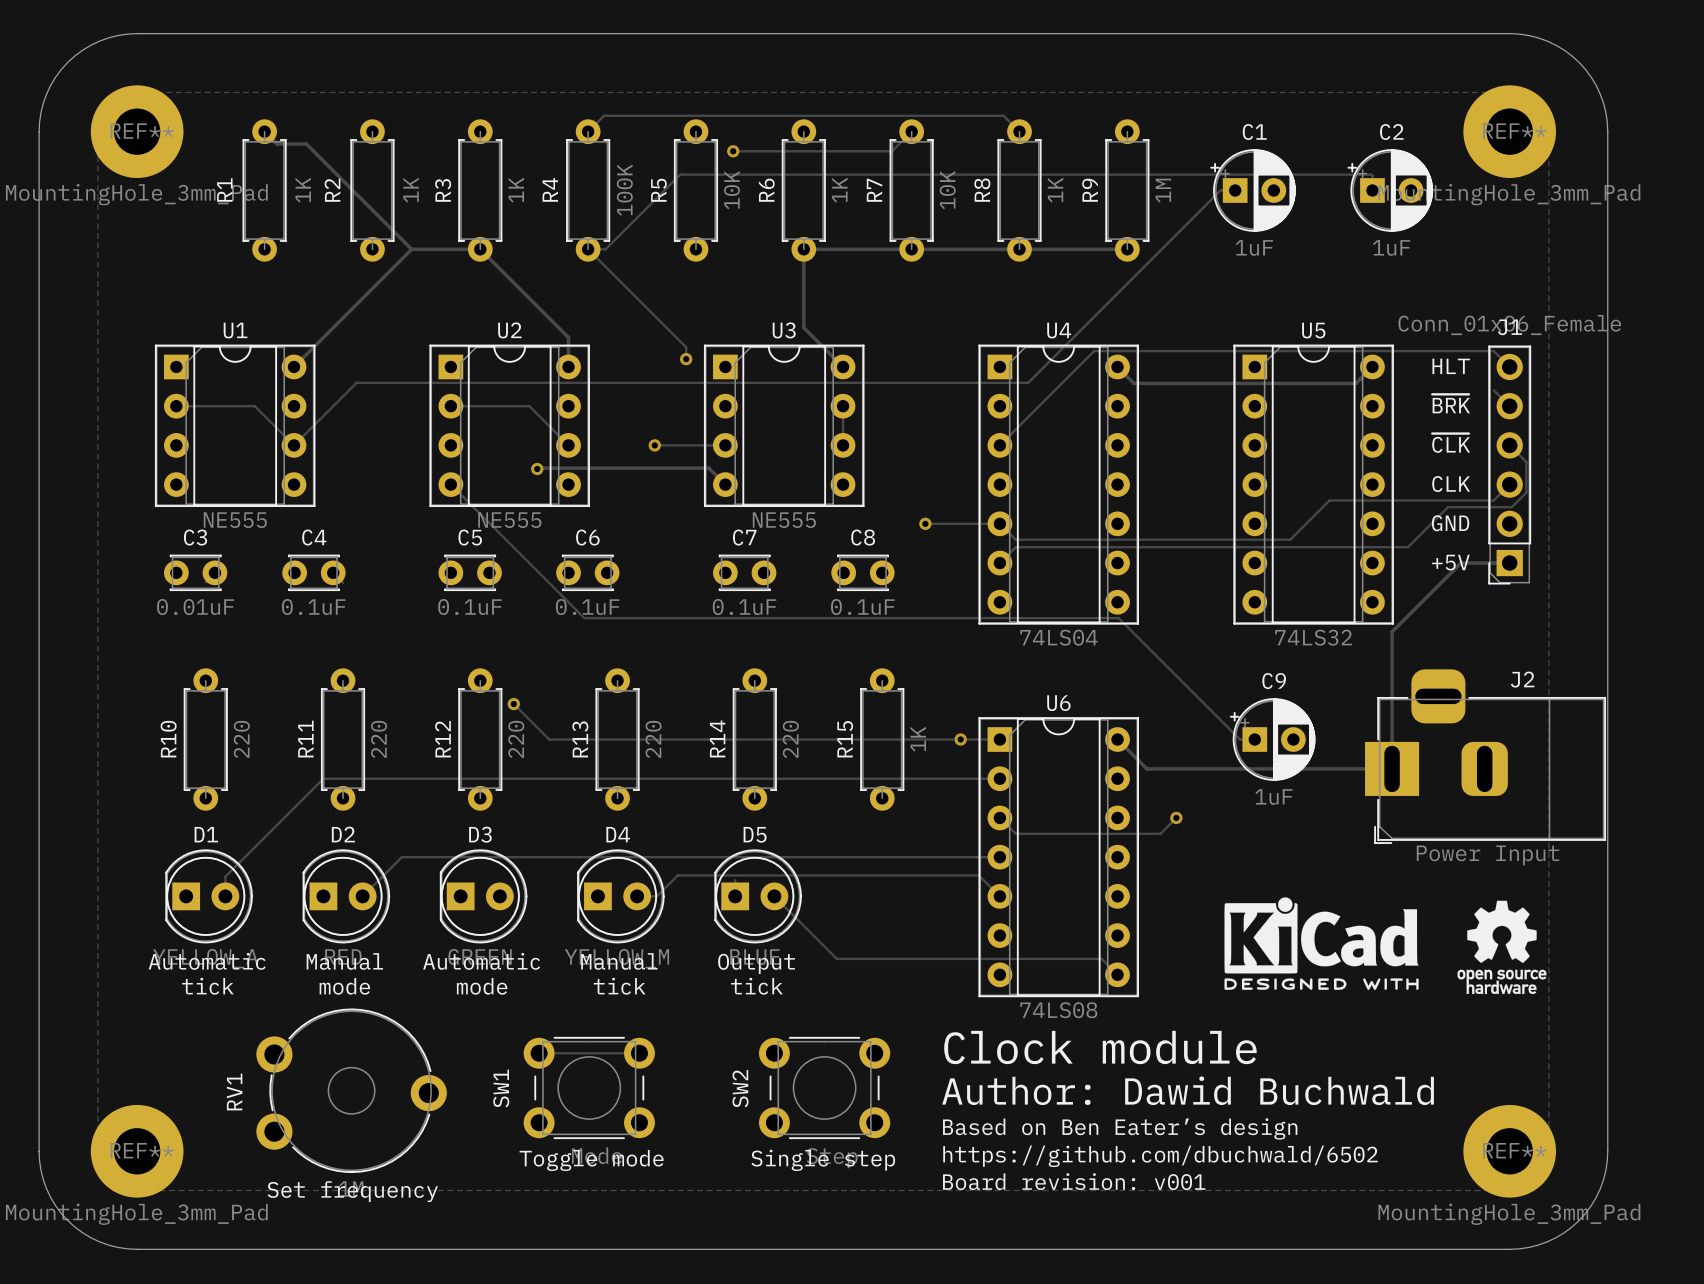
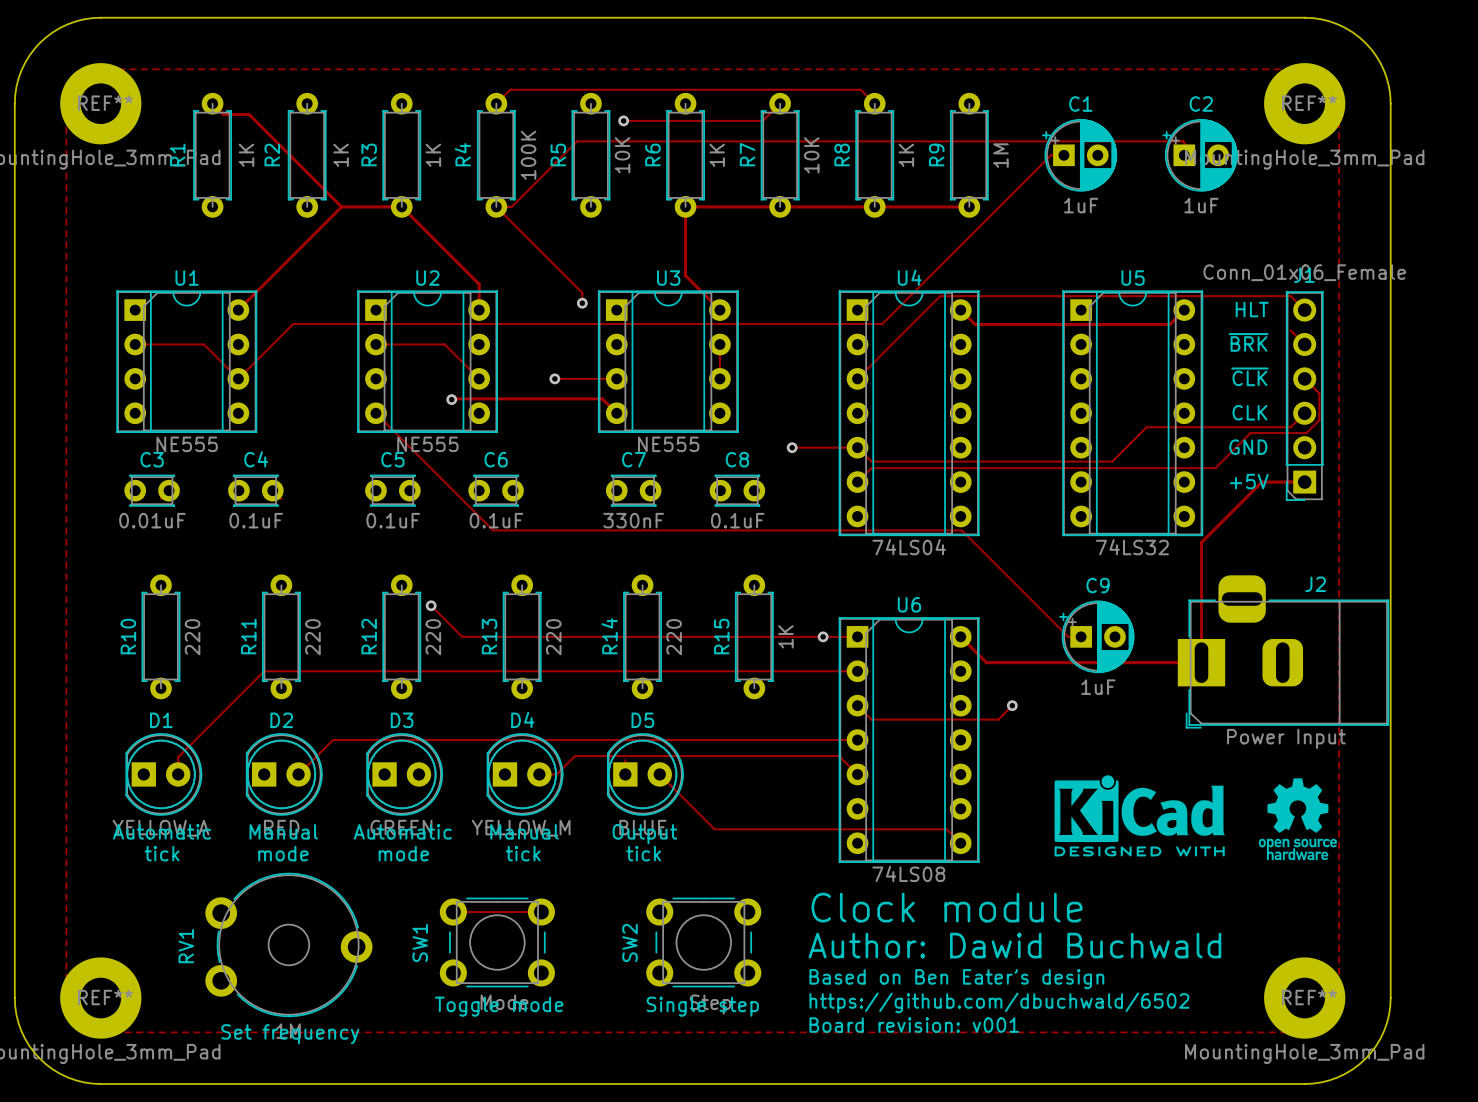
C7 value: 0.1uF (744, 607) -> 330nF (633, 520)

